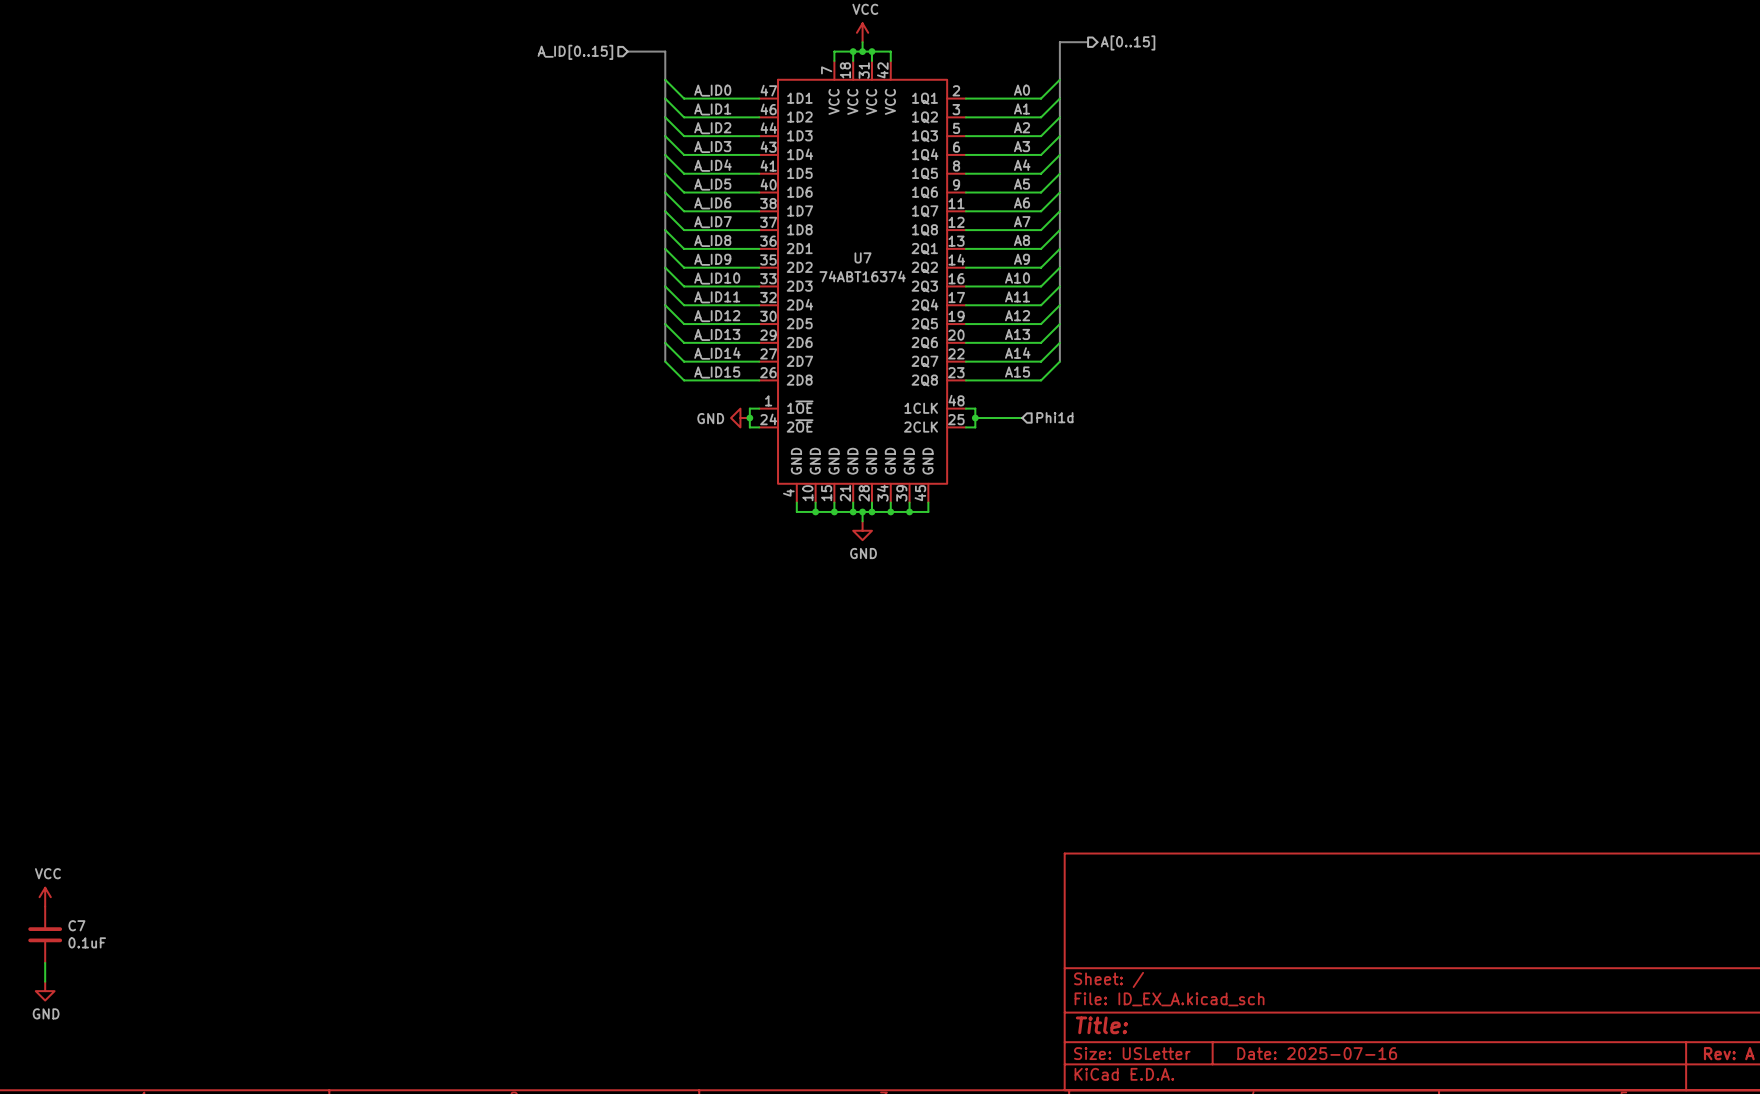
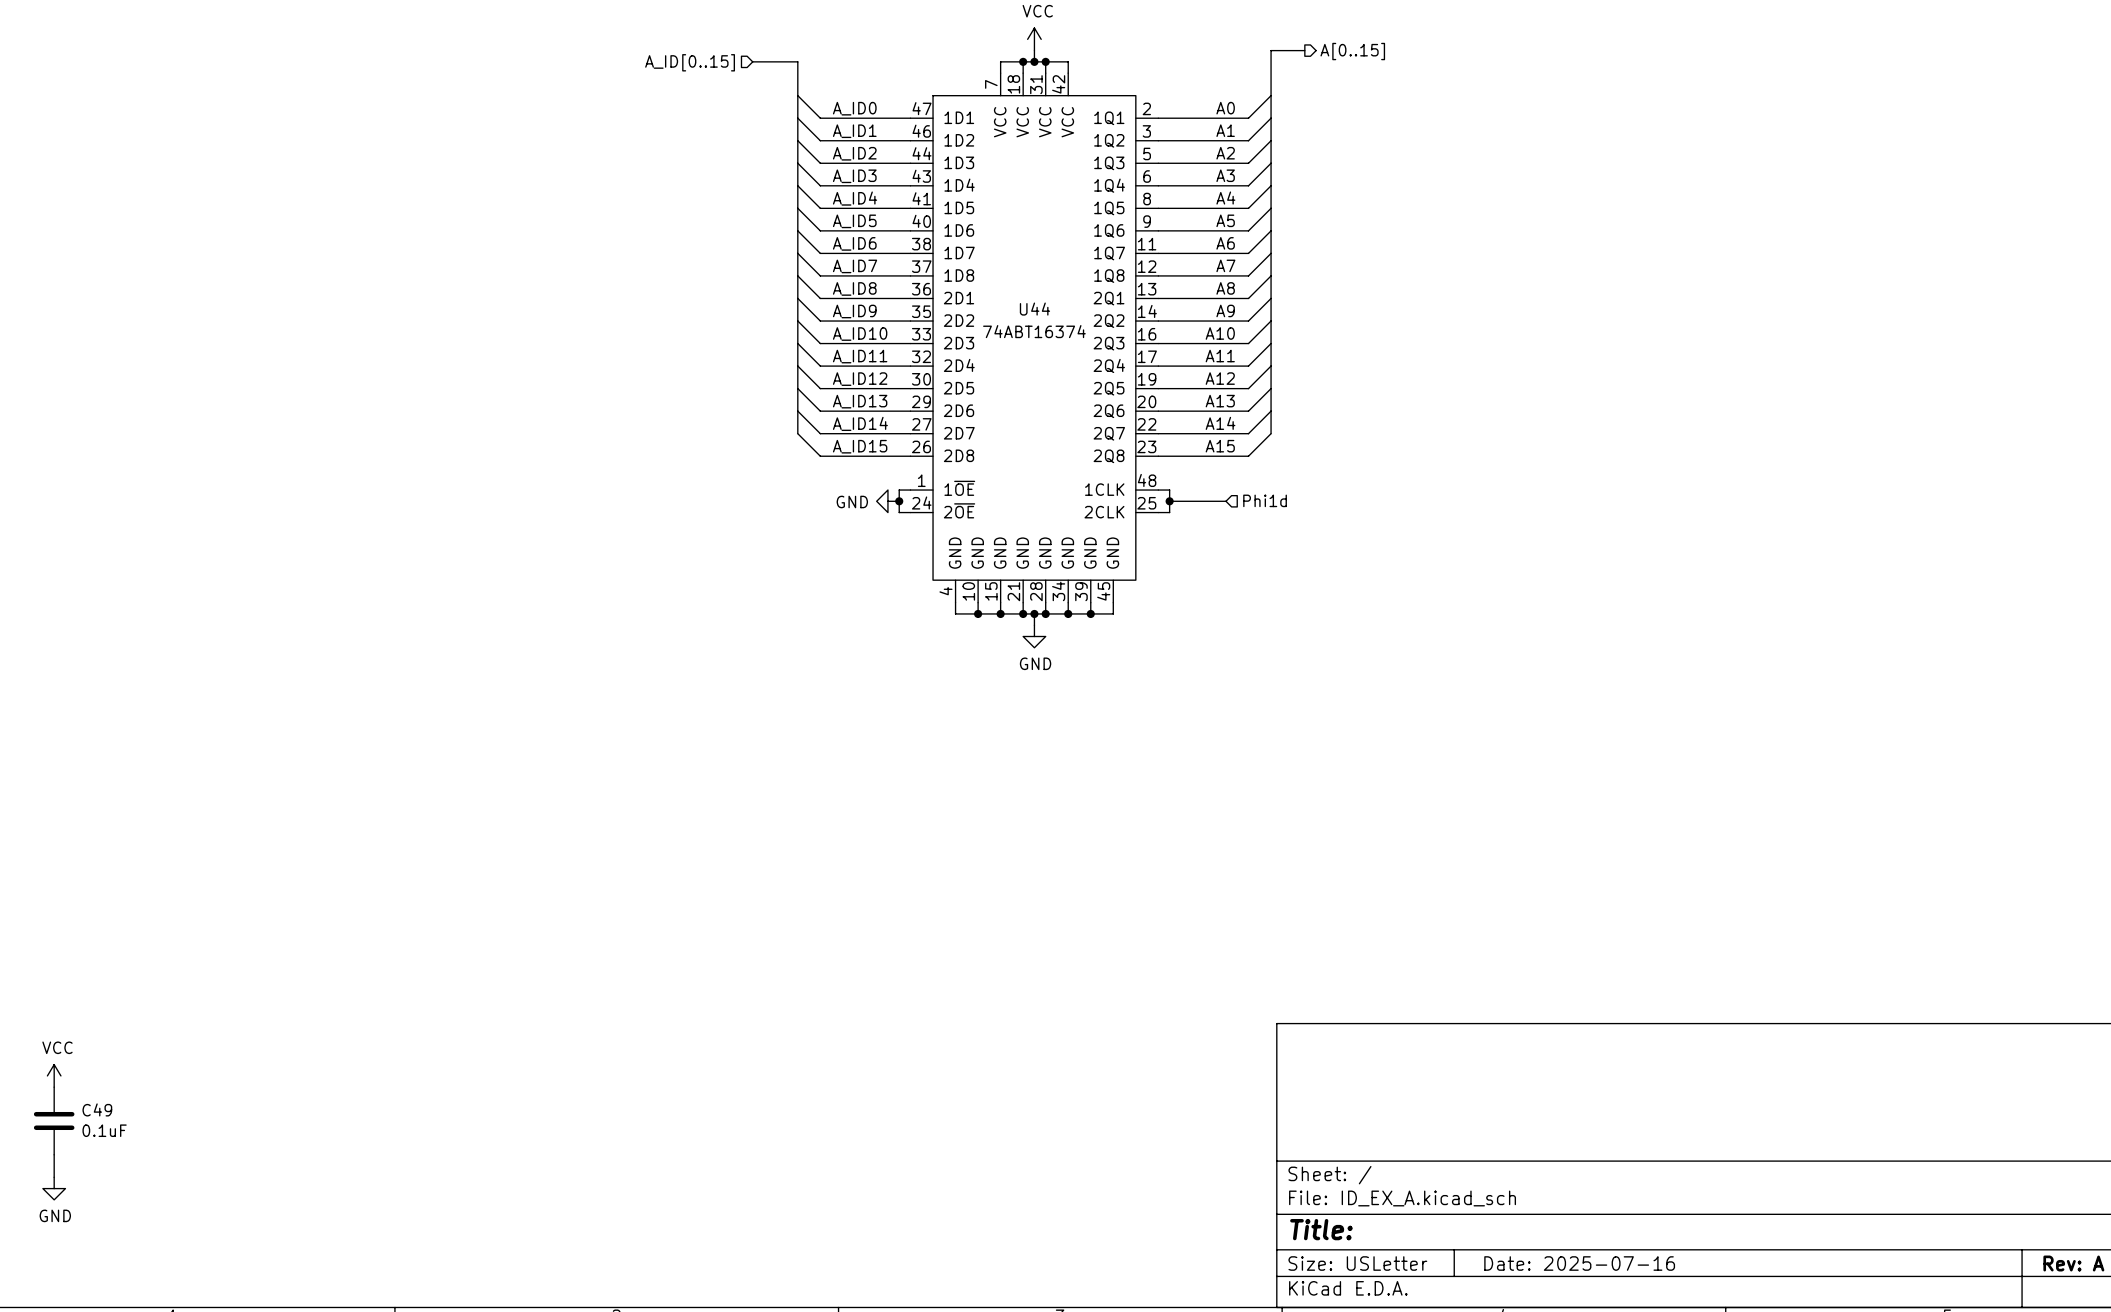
U7 name: U7 (863, 257) -> U44 (1034, 309)
C7 name: C7 (76, 925) -> C49 (97, 1109)

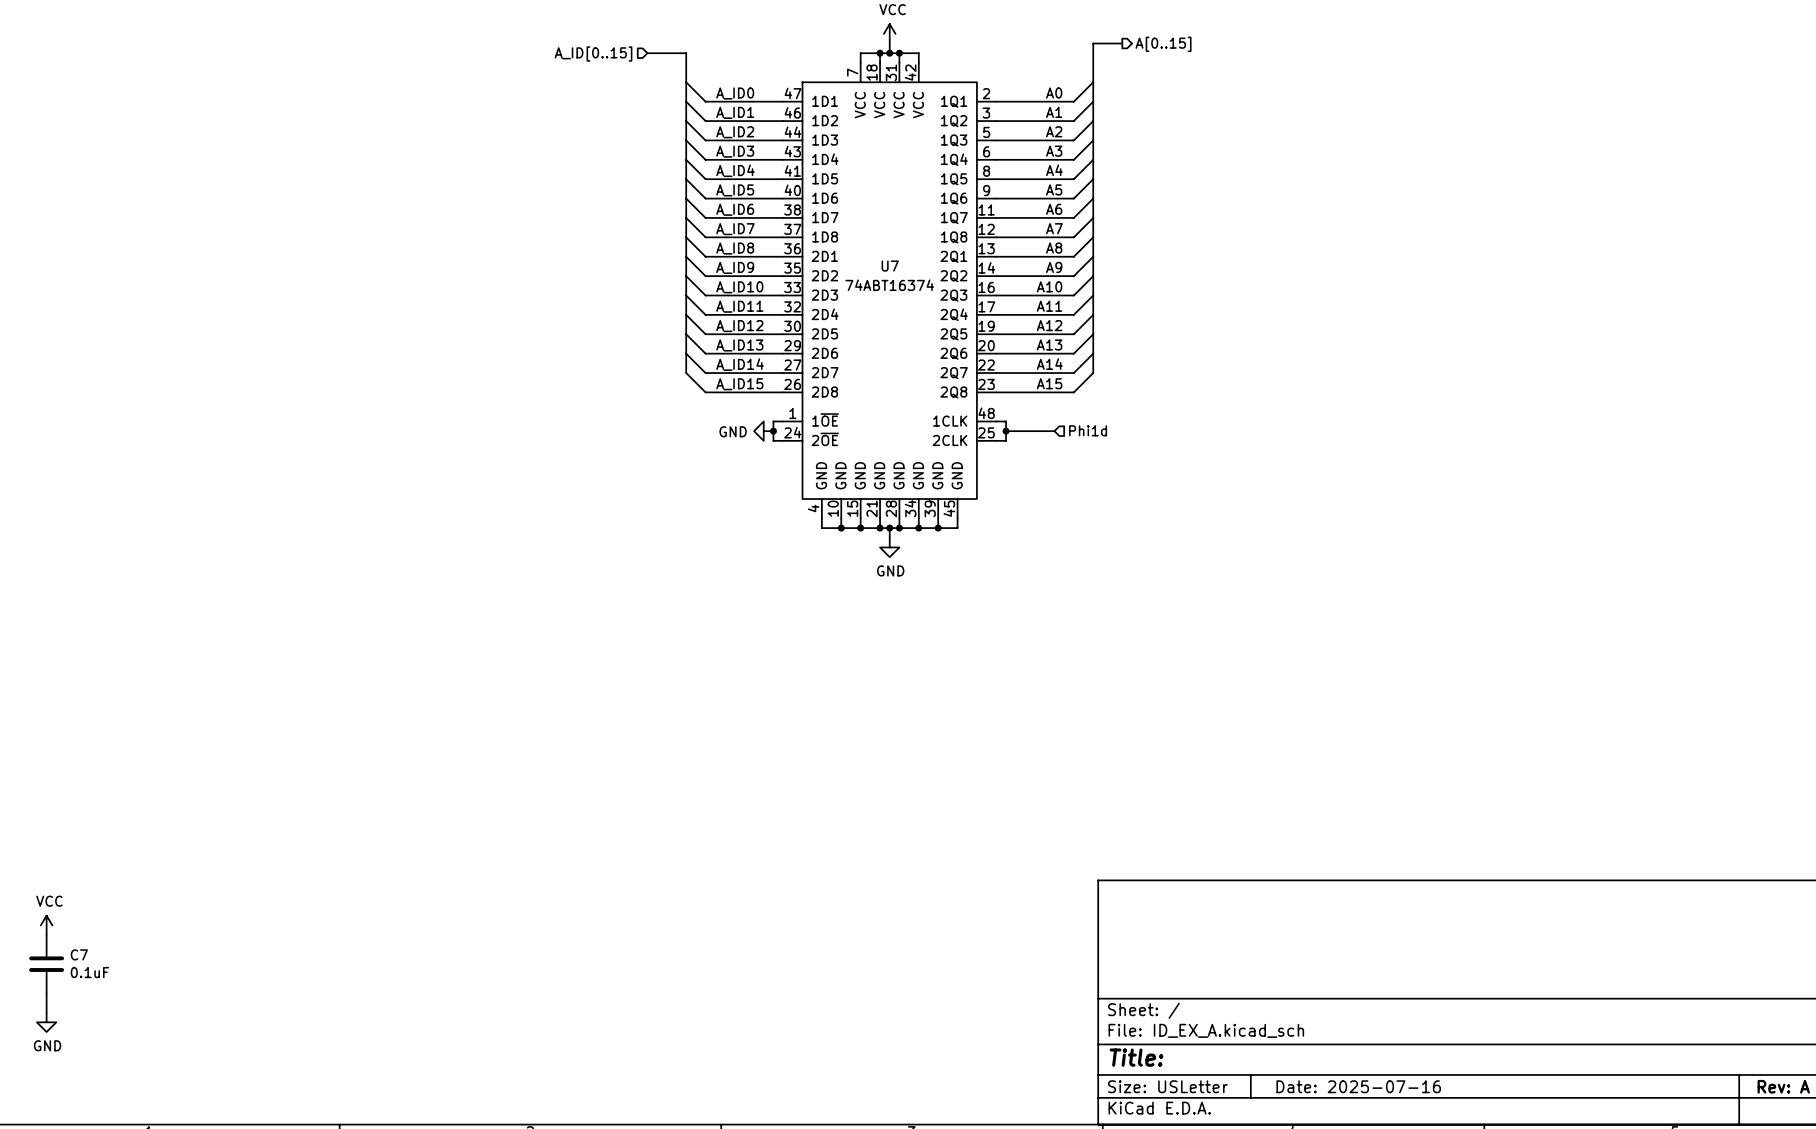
U44 name: U44 (1034, 309) -> U7 (890, 266)
C49 name: C49 (97, 1109) -> C7 (79, 954)

